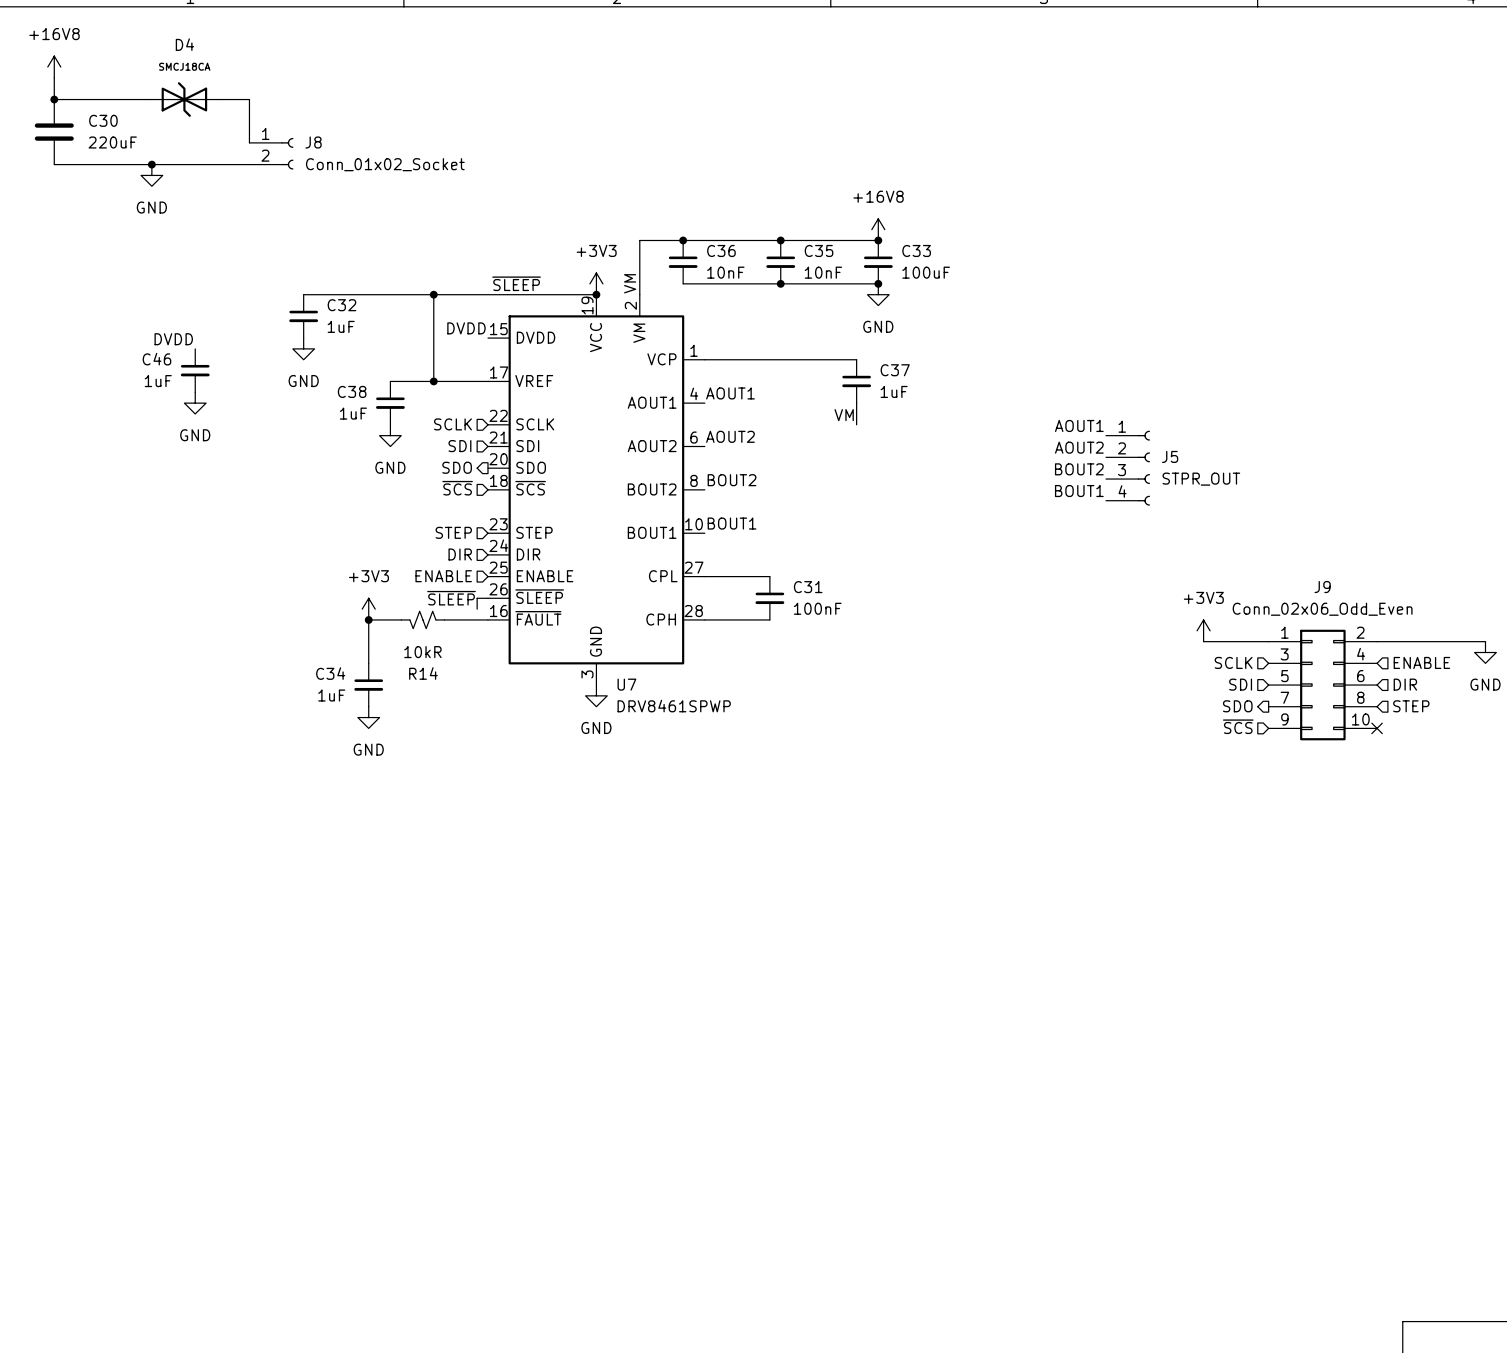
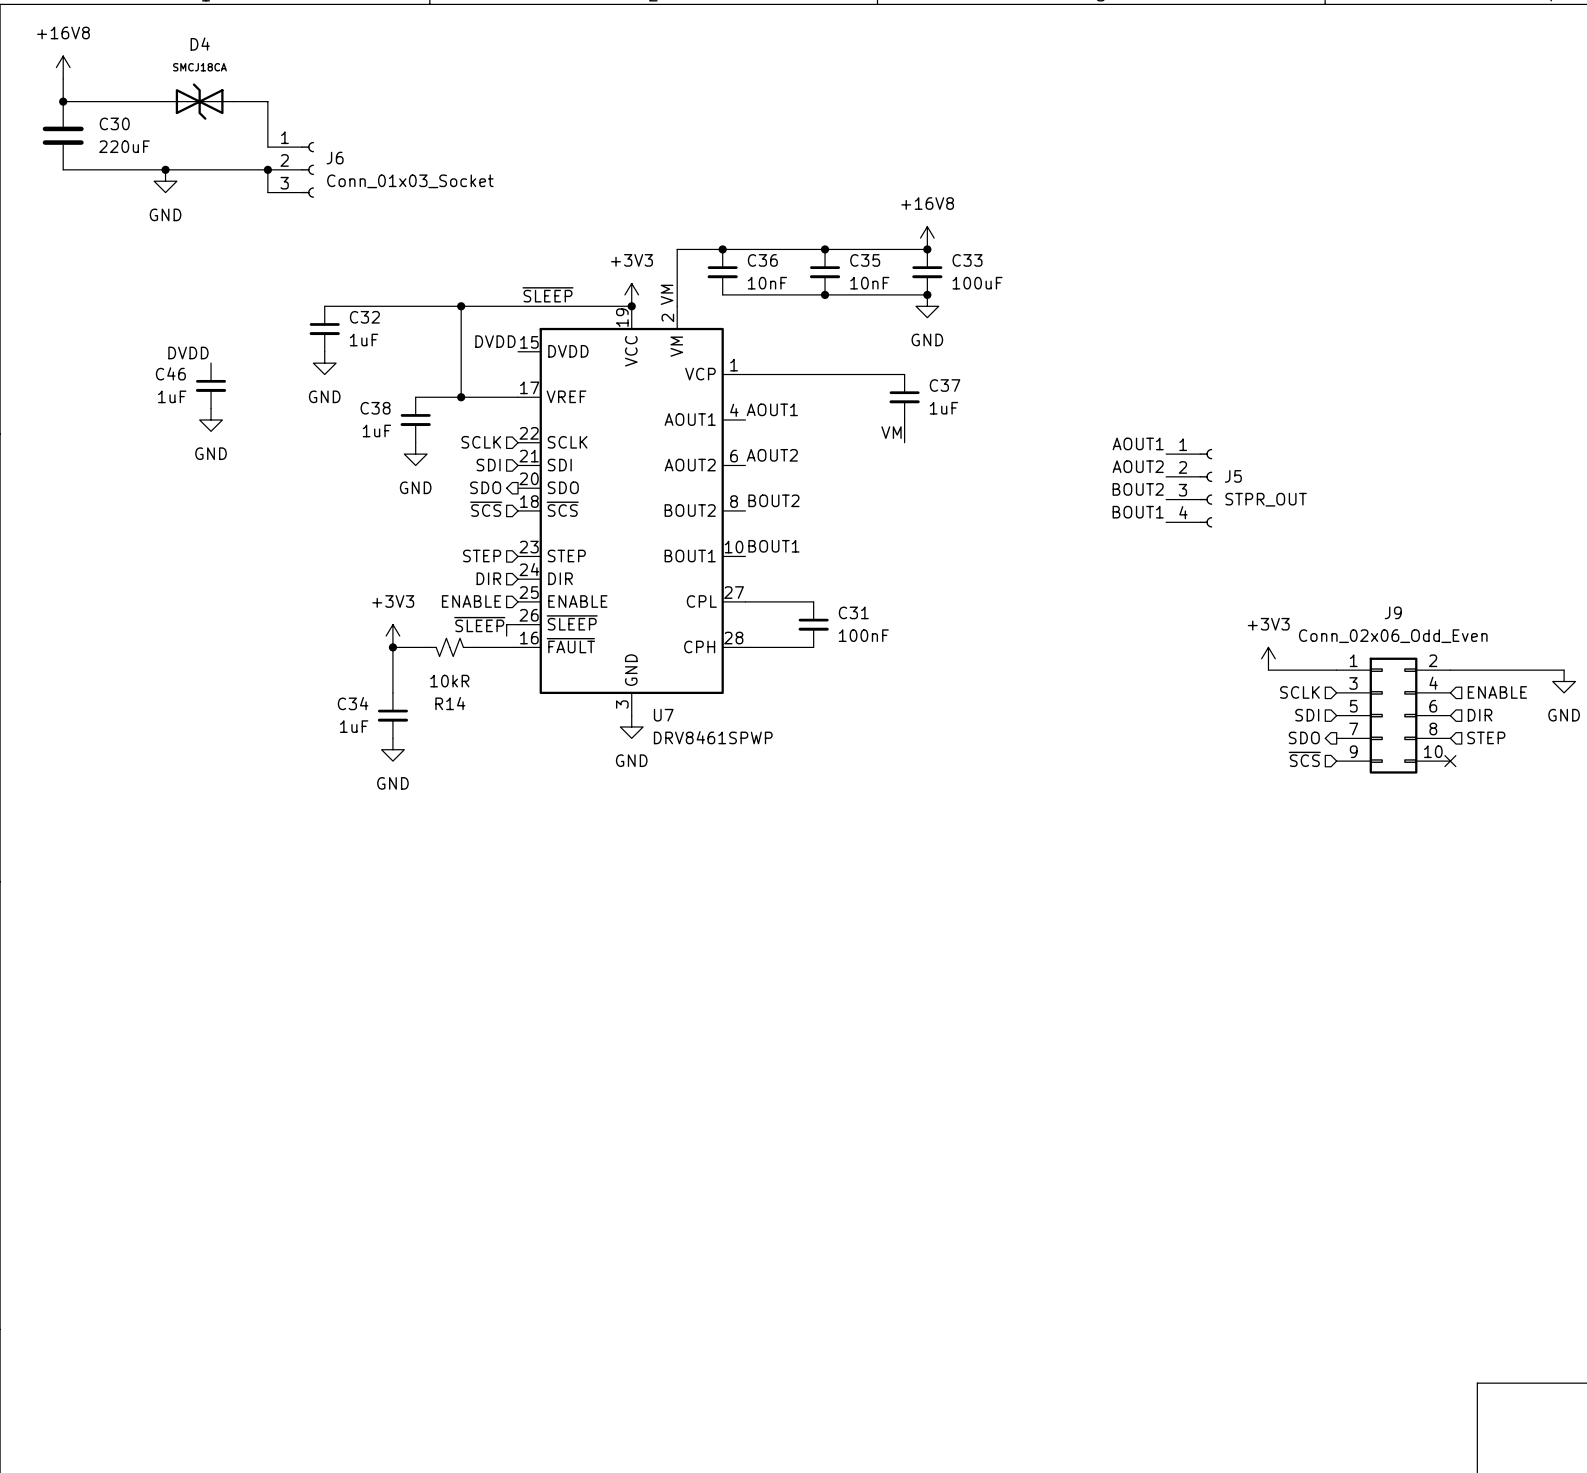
J8: Conn_01x02_Socket (271, 153) -> none
wire: none -> (267, 169) (267, 192)
junction: none -> (267, 169)
J6: none -> Conn_01x03_Socket (290, 169)

